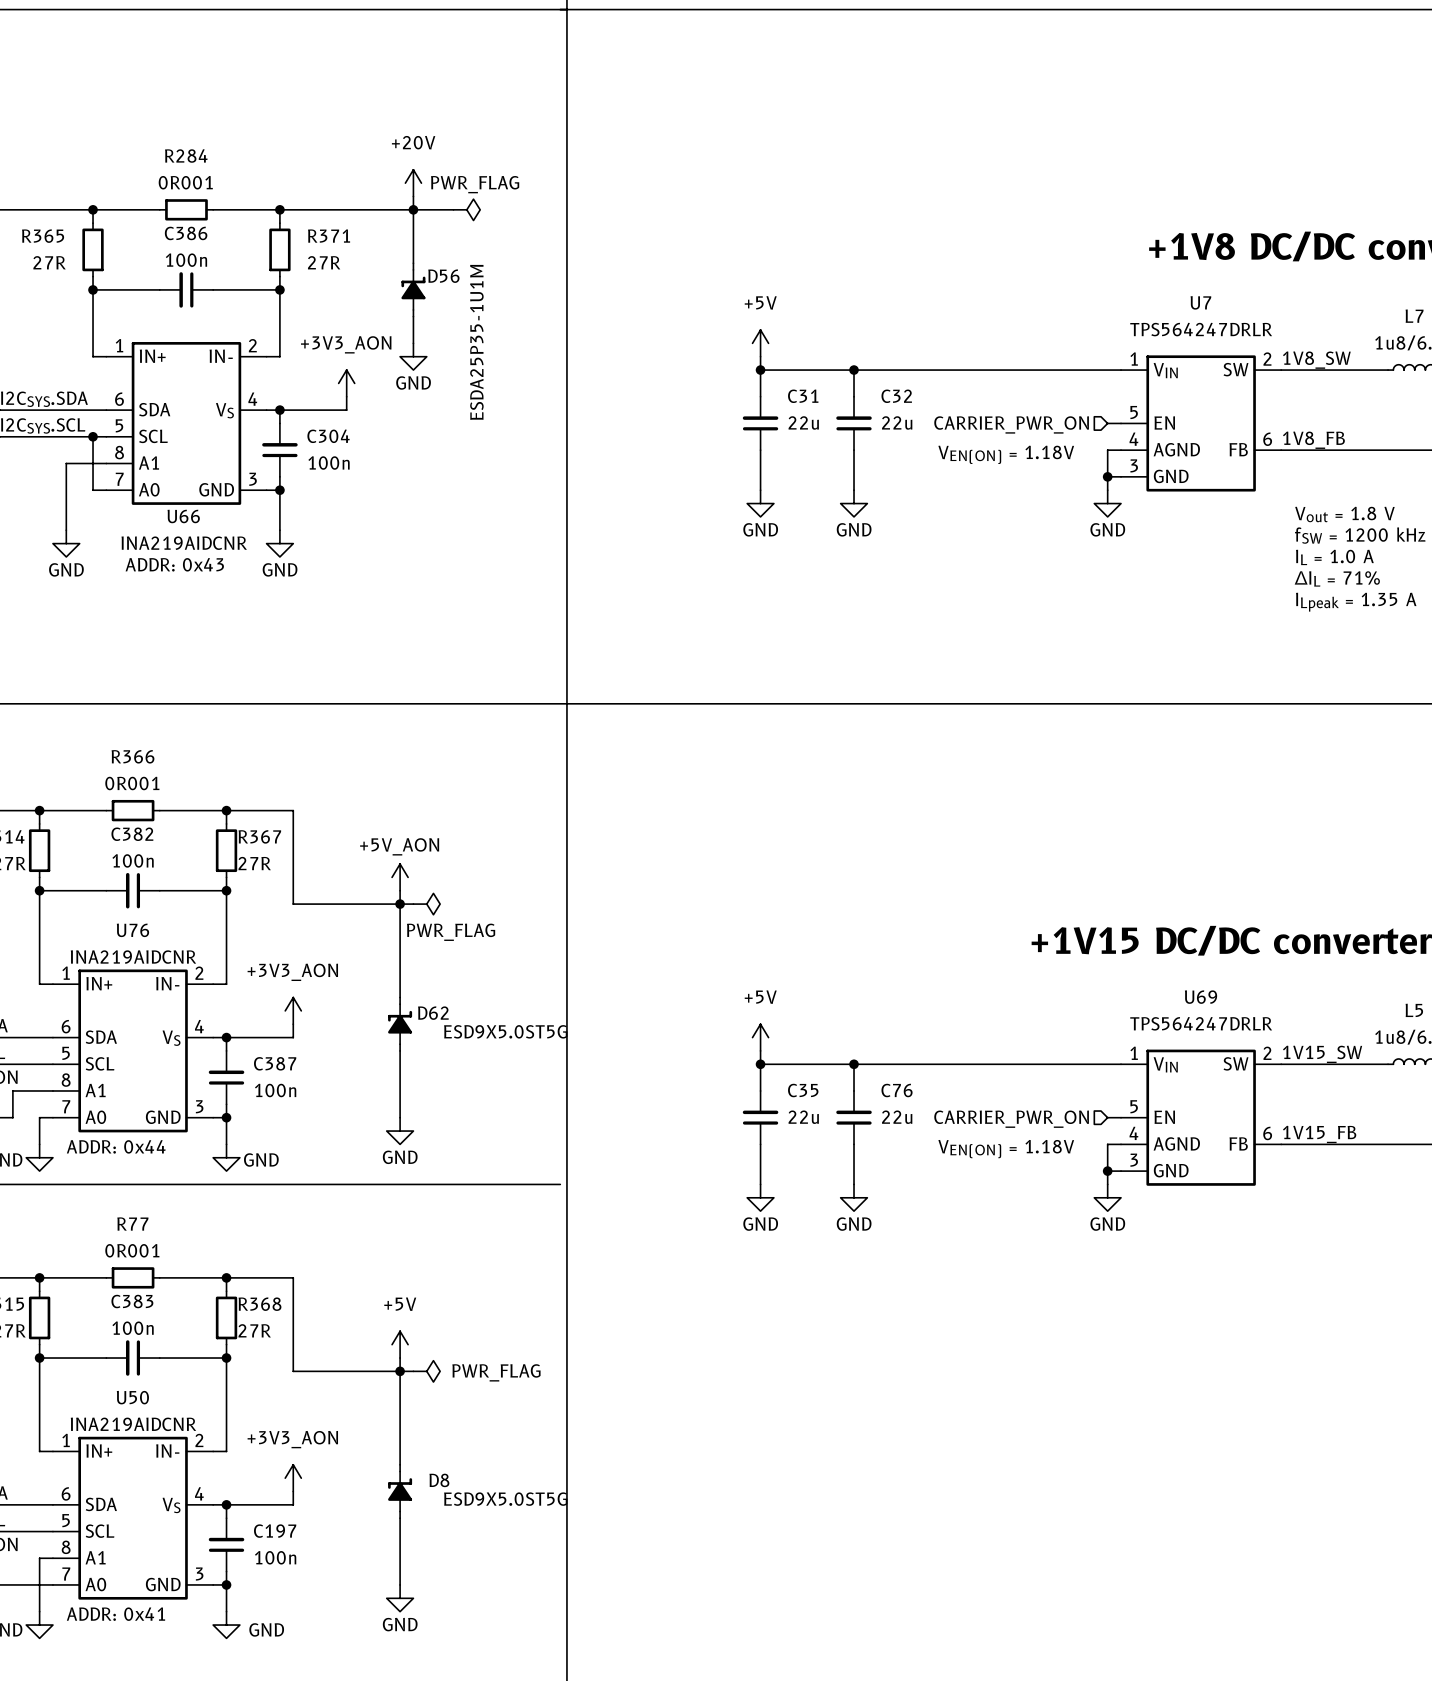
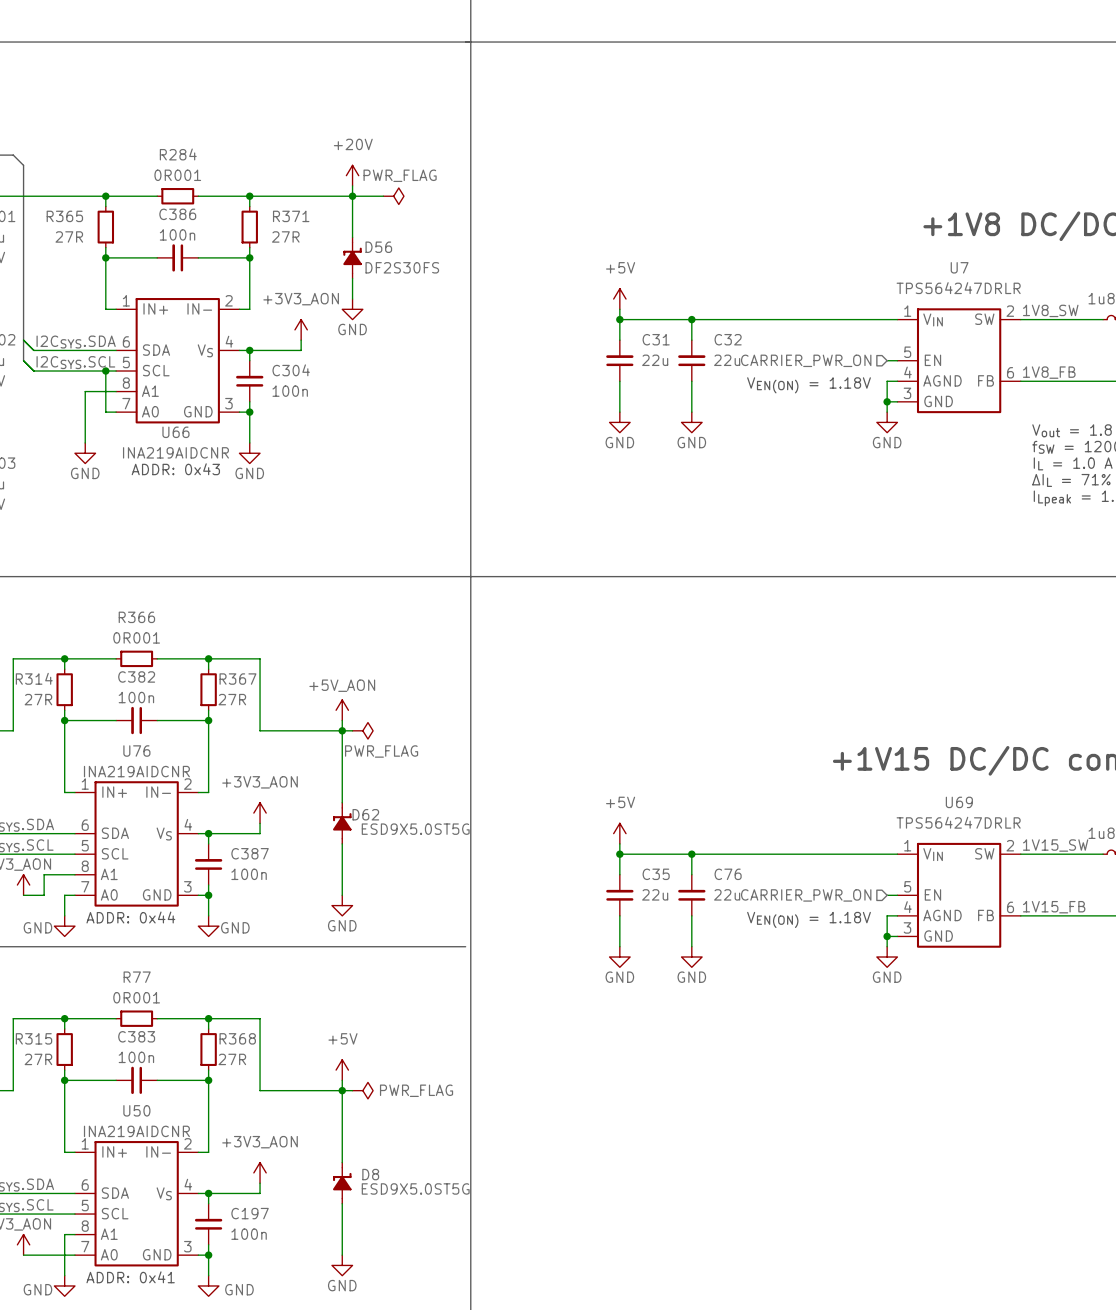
D56 text: ESDA25P35-1U1M (476, 342) -> DF2S30FS (402, 267)

